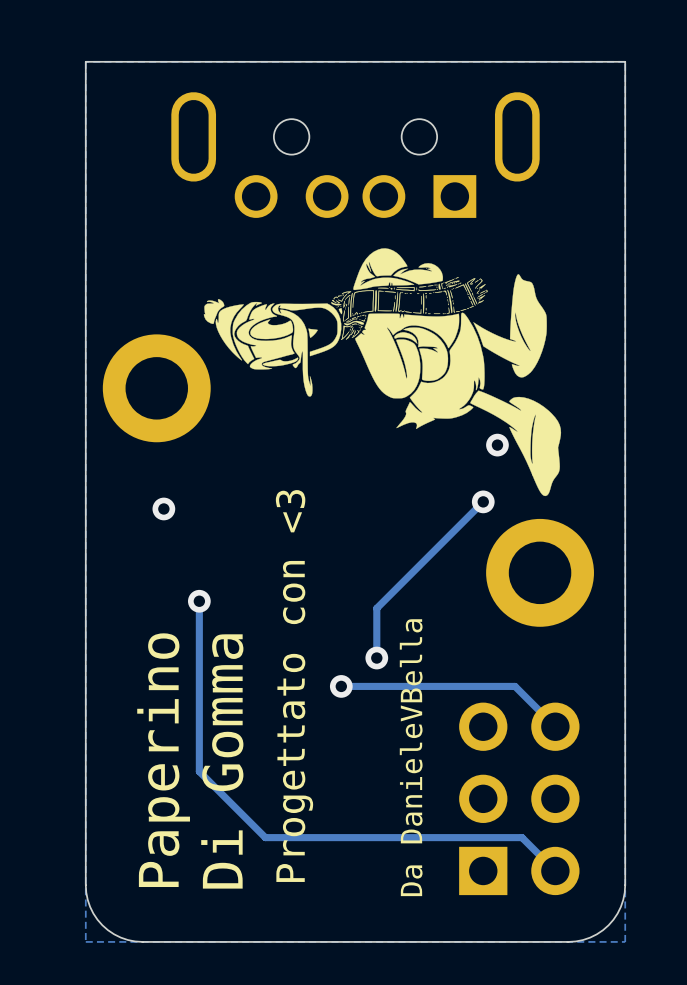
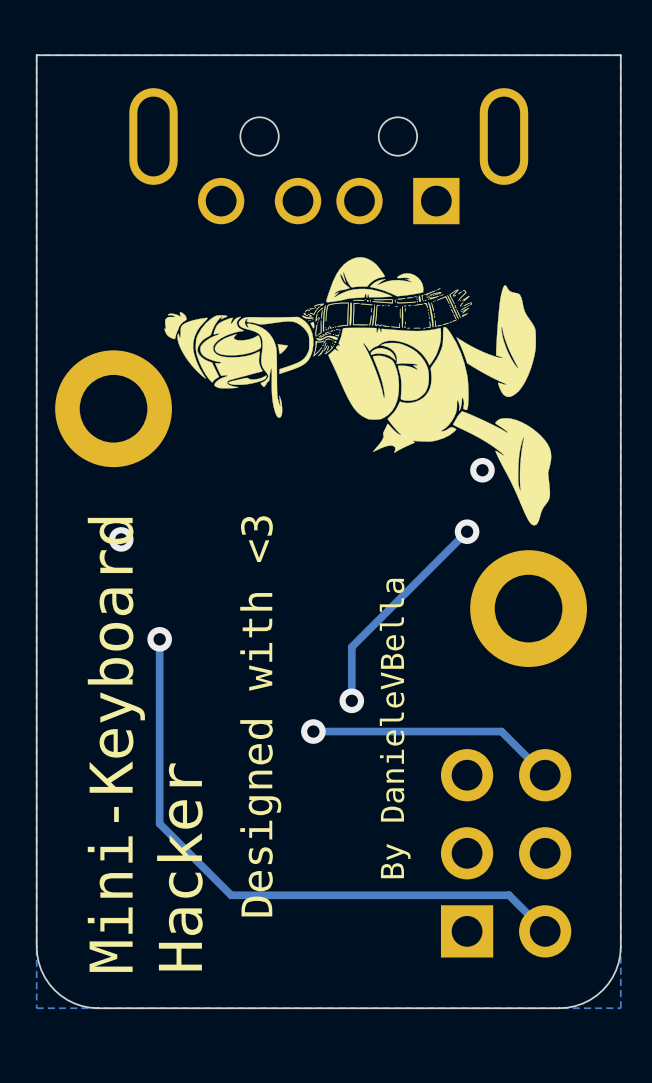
text: Progettato con <3 (294, 686) -> Designed with <3 (260, 716)
text: Da DanieleVBella (411, 757) -> By DanieleVBella (395, 728)
text: Paperino (163, 760) -> Mini-Keyboard (116, 744)
text: Di Gomma (222, 761) -> Hacker (179, 866)

